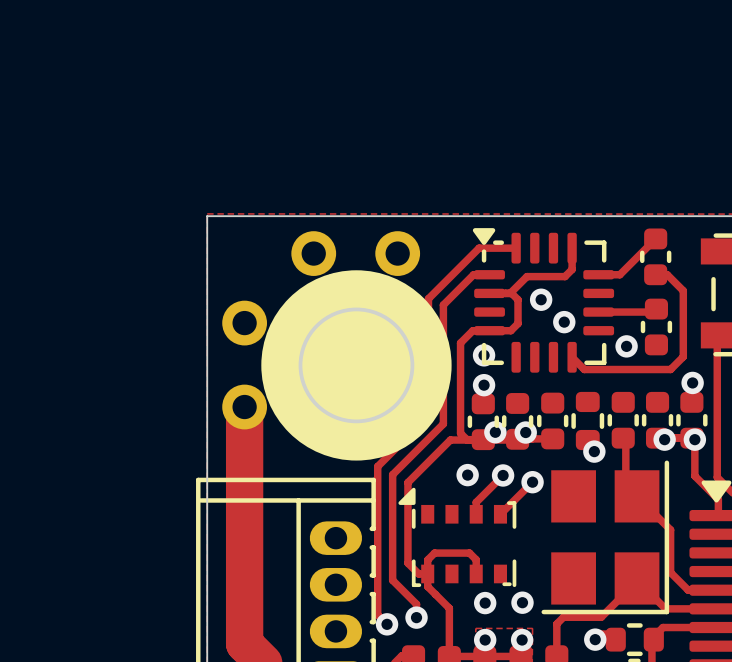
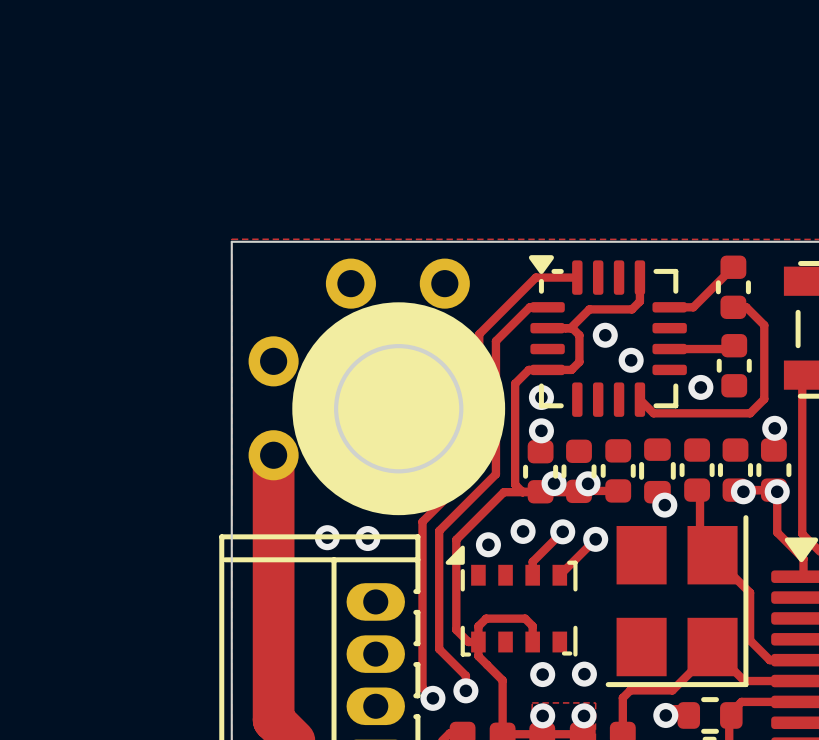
via: none -> (327, 537)
via: none -> (367, 538)
via: none -> (488, 544)

